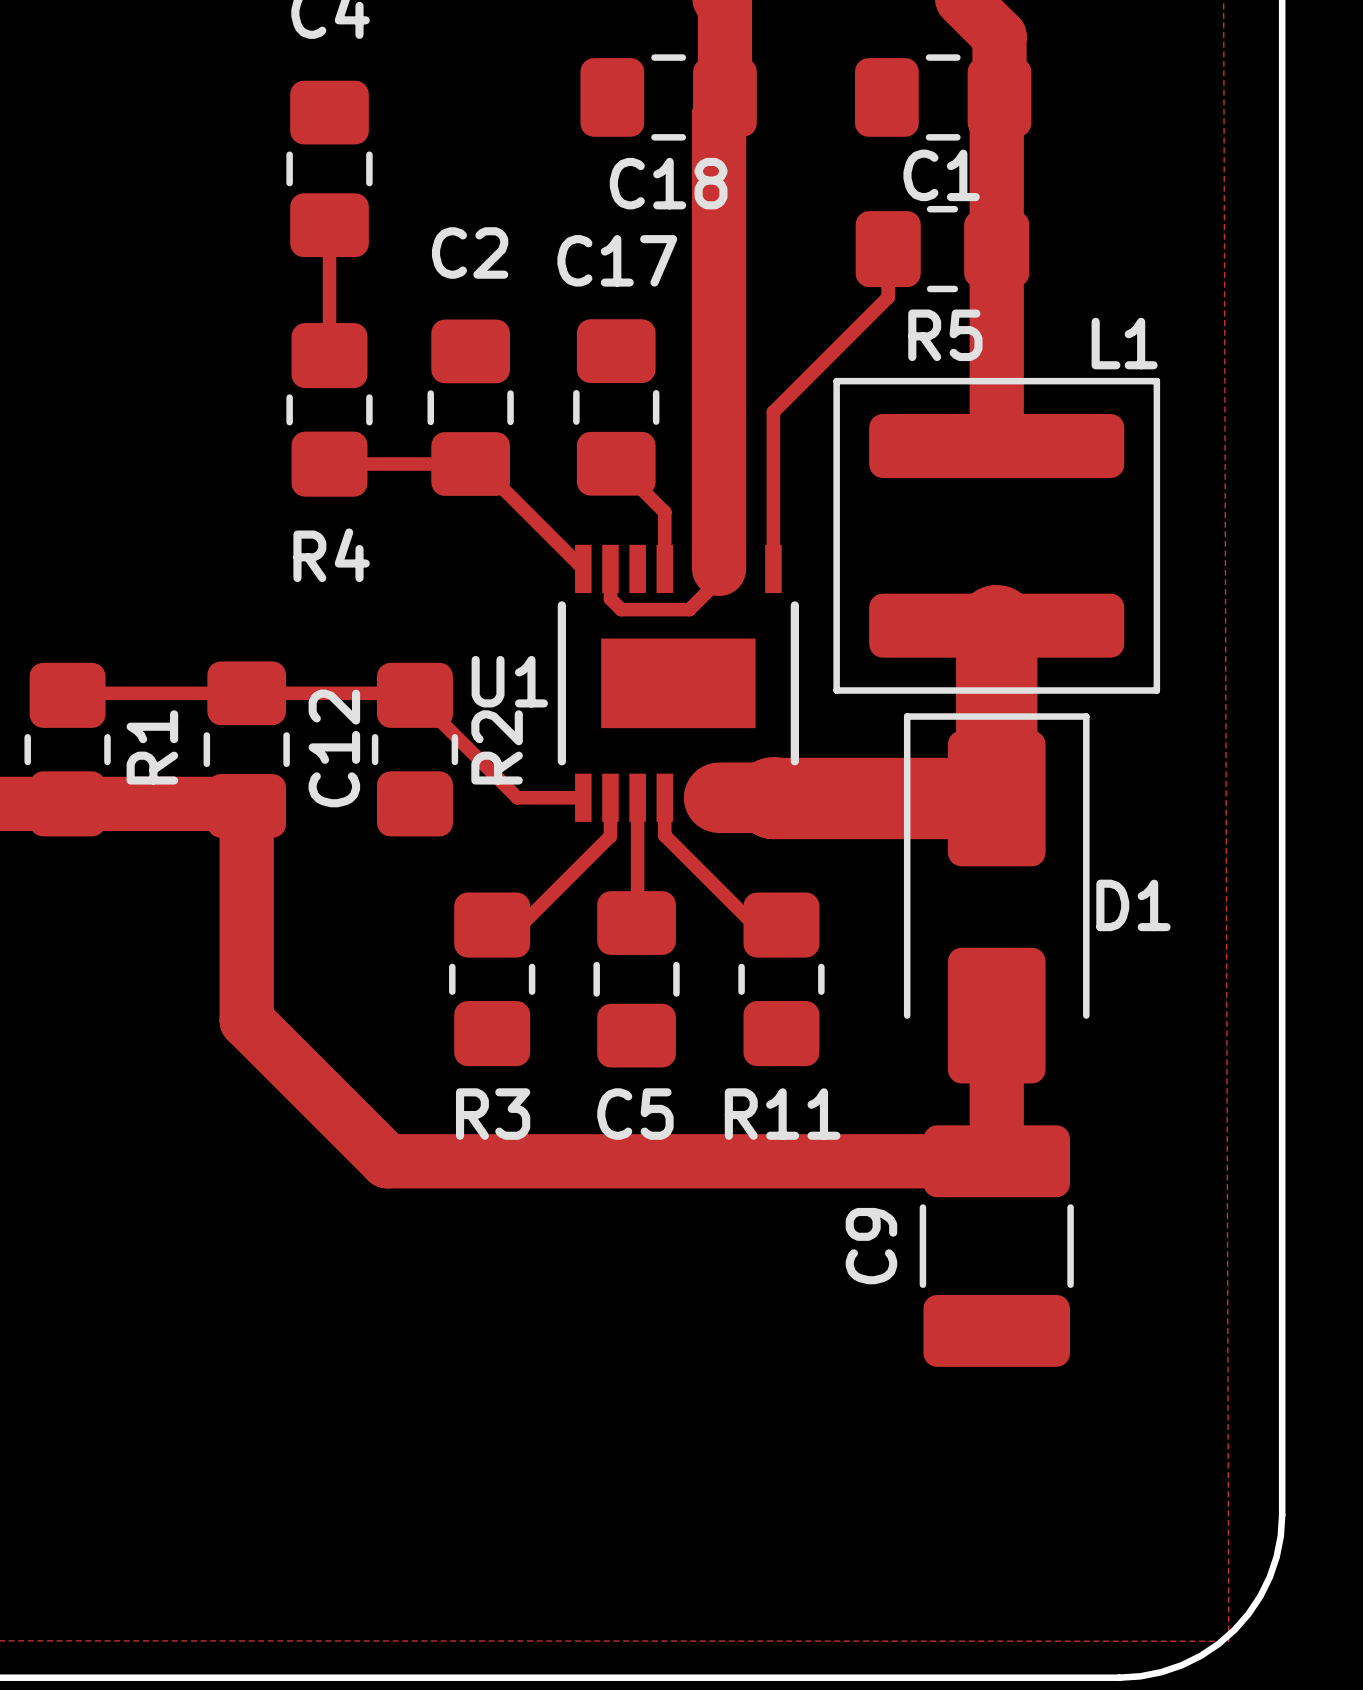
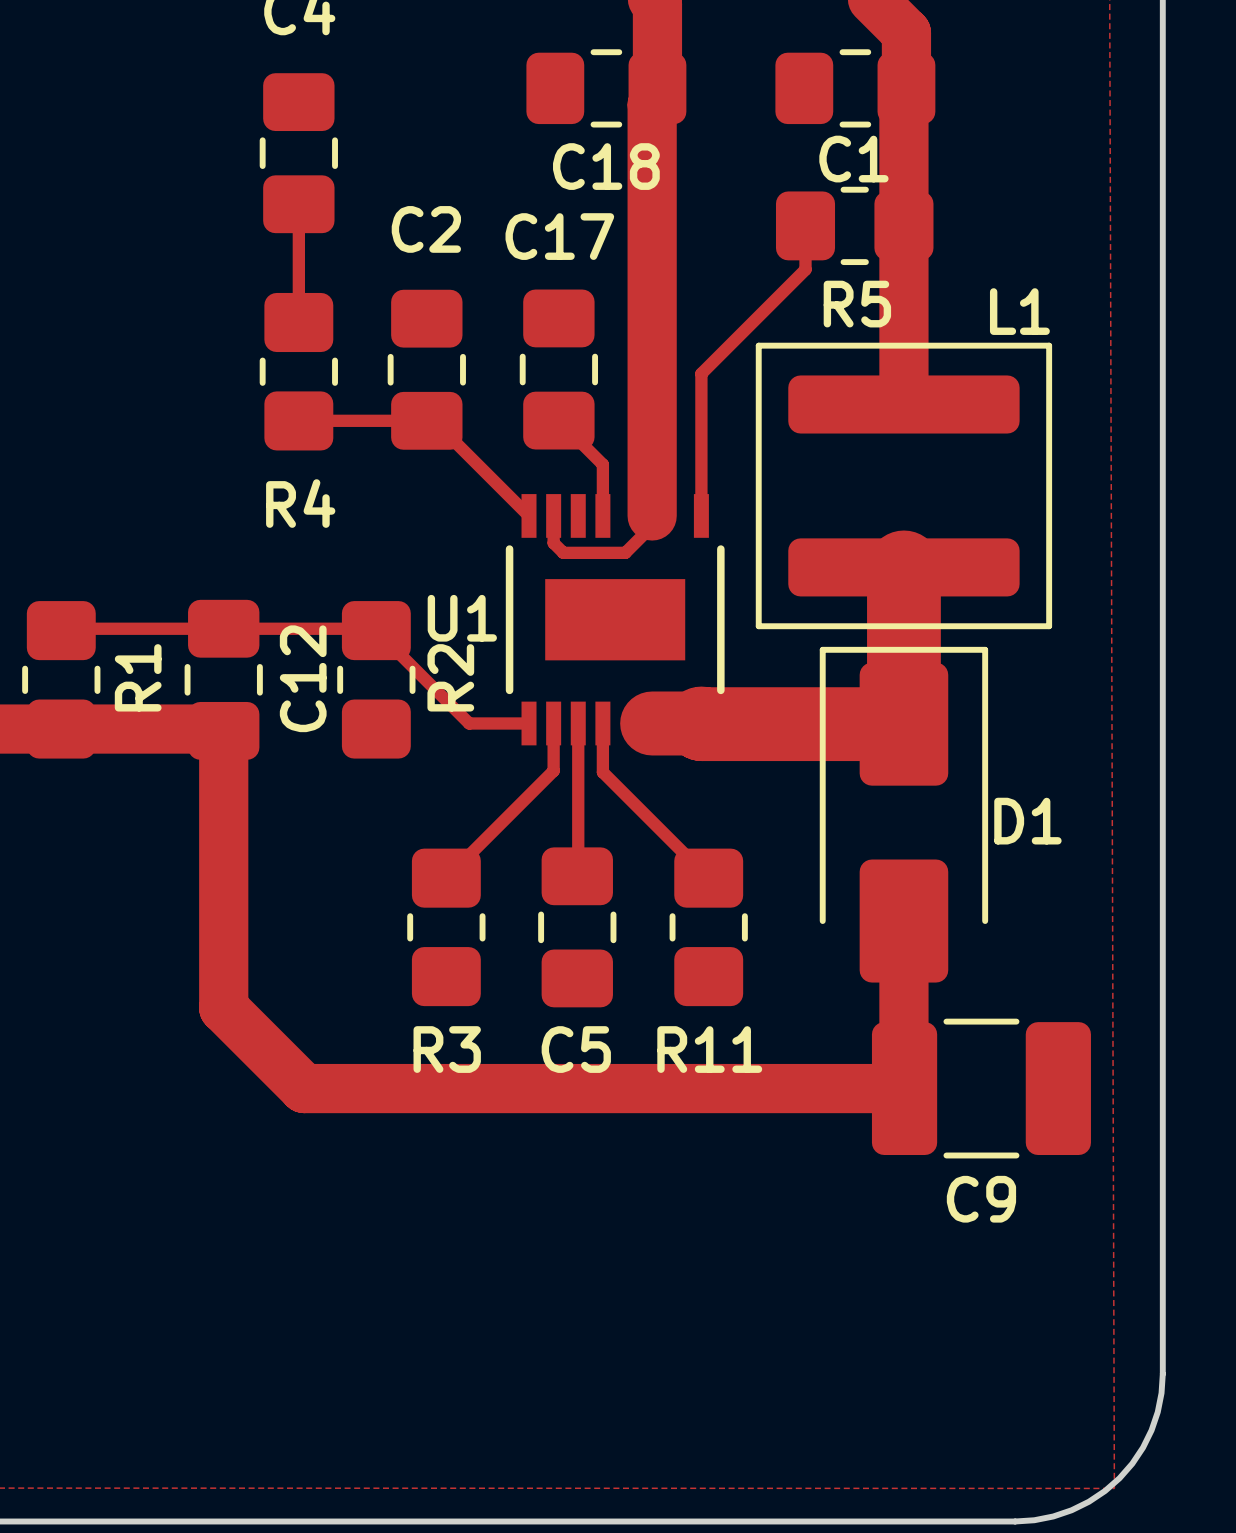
track: (664, 835) (754, 925) (781, 925) -> (602, 757) (602, 772) (708, 878)
track: (610, 836) (521, 925) (492, 925) -> (553, 758) (553, 770) (446, 878)
R3 position: (492, 979) -> (446, 927)
C5 position: (636, 979) -> (577, 927)
R11 position: (781, 979) -> (708, 927)
track: (246, 1020) (387, 1161) (996, 1161) -> (223, 925) (223, 1008) (304, 1088) (904, 1088) (904, 1084)
C9 name position: C9 (871, 1246) -> C9 (981, 1199)
C9 rotation: 0° (996, 1246) -> 90° clockwise (981, 1088)

